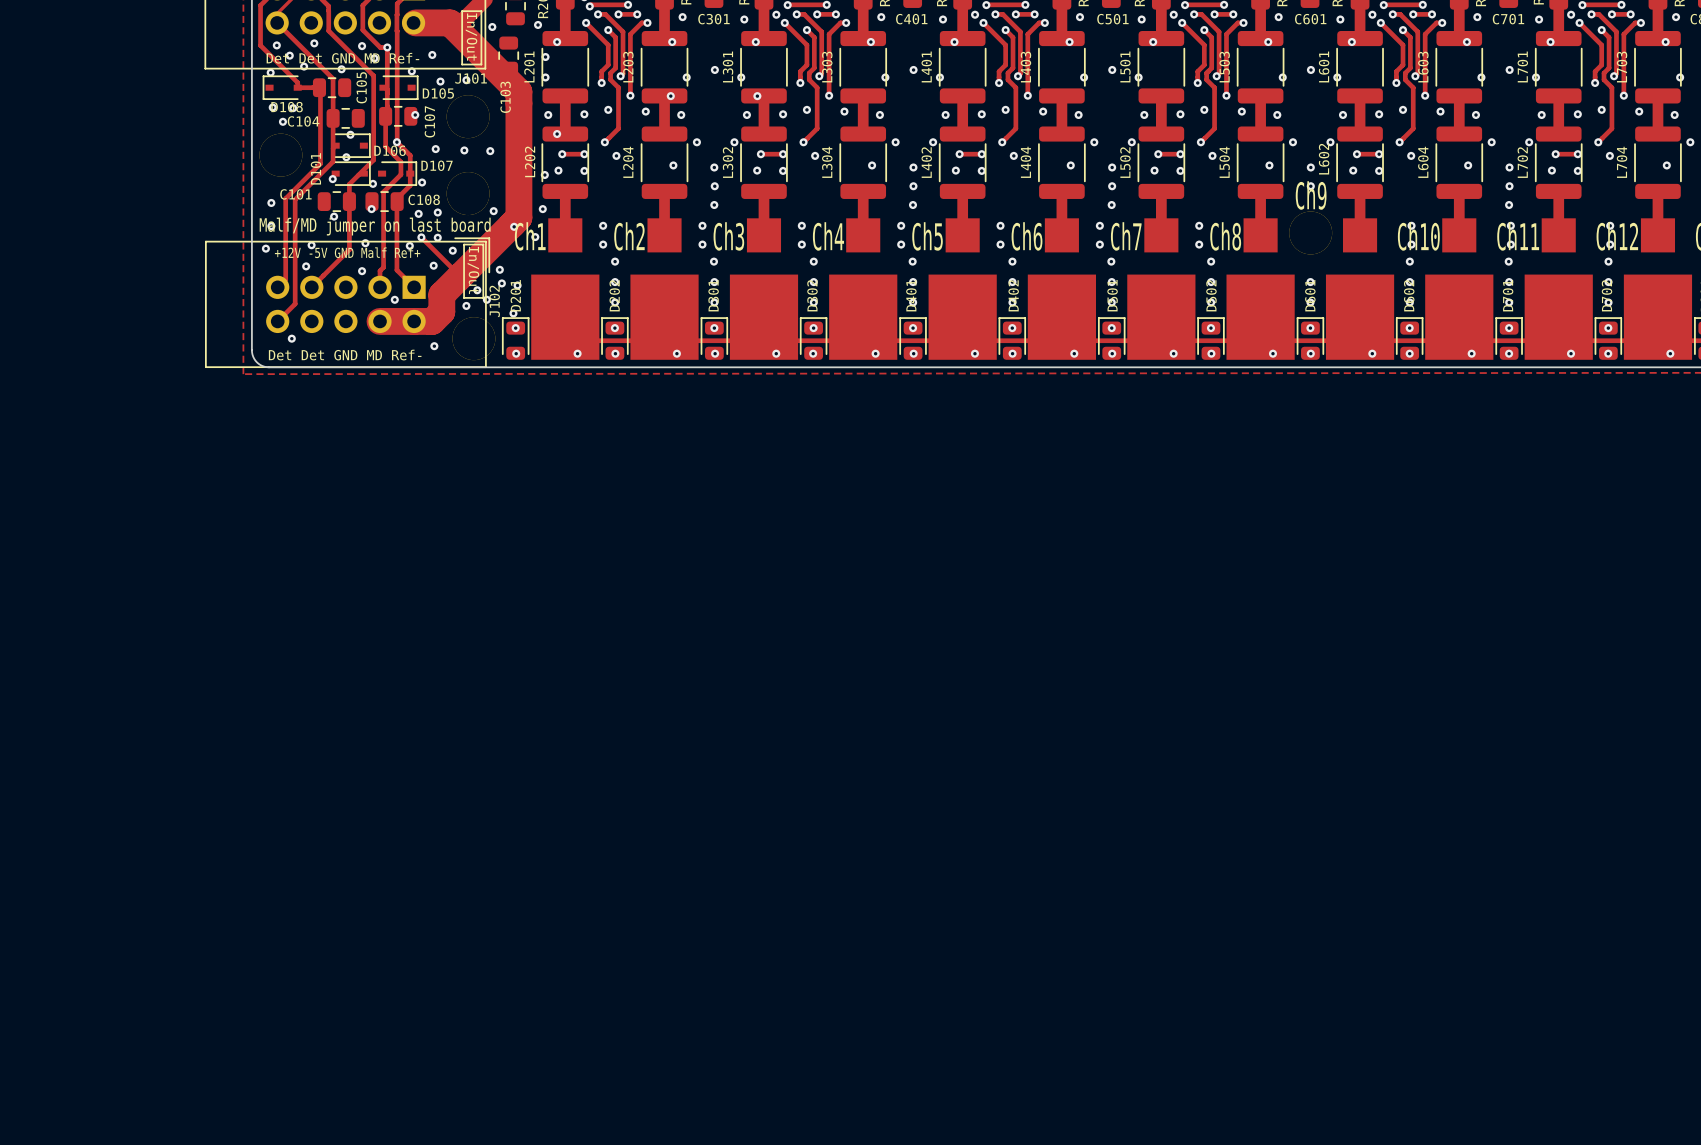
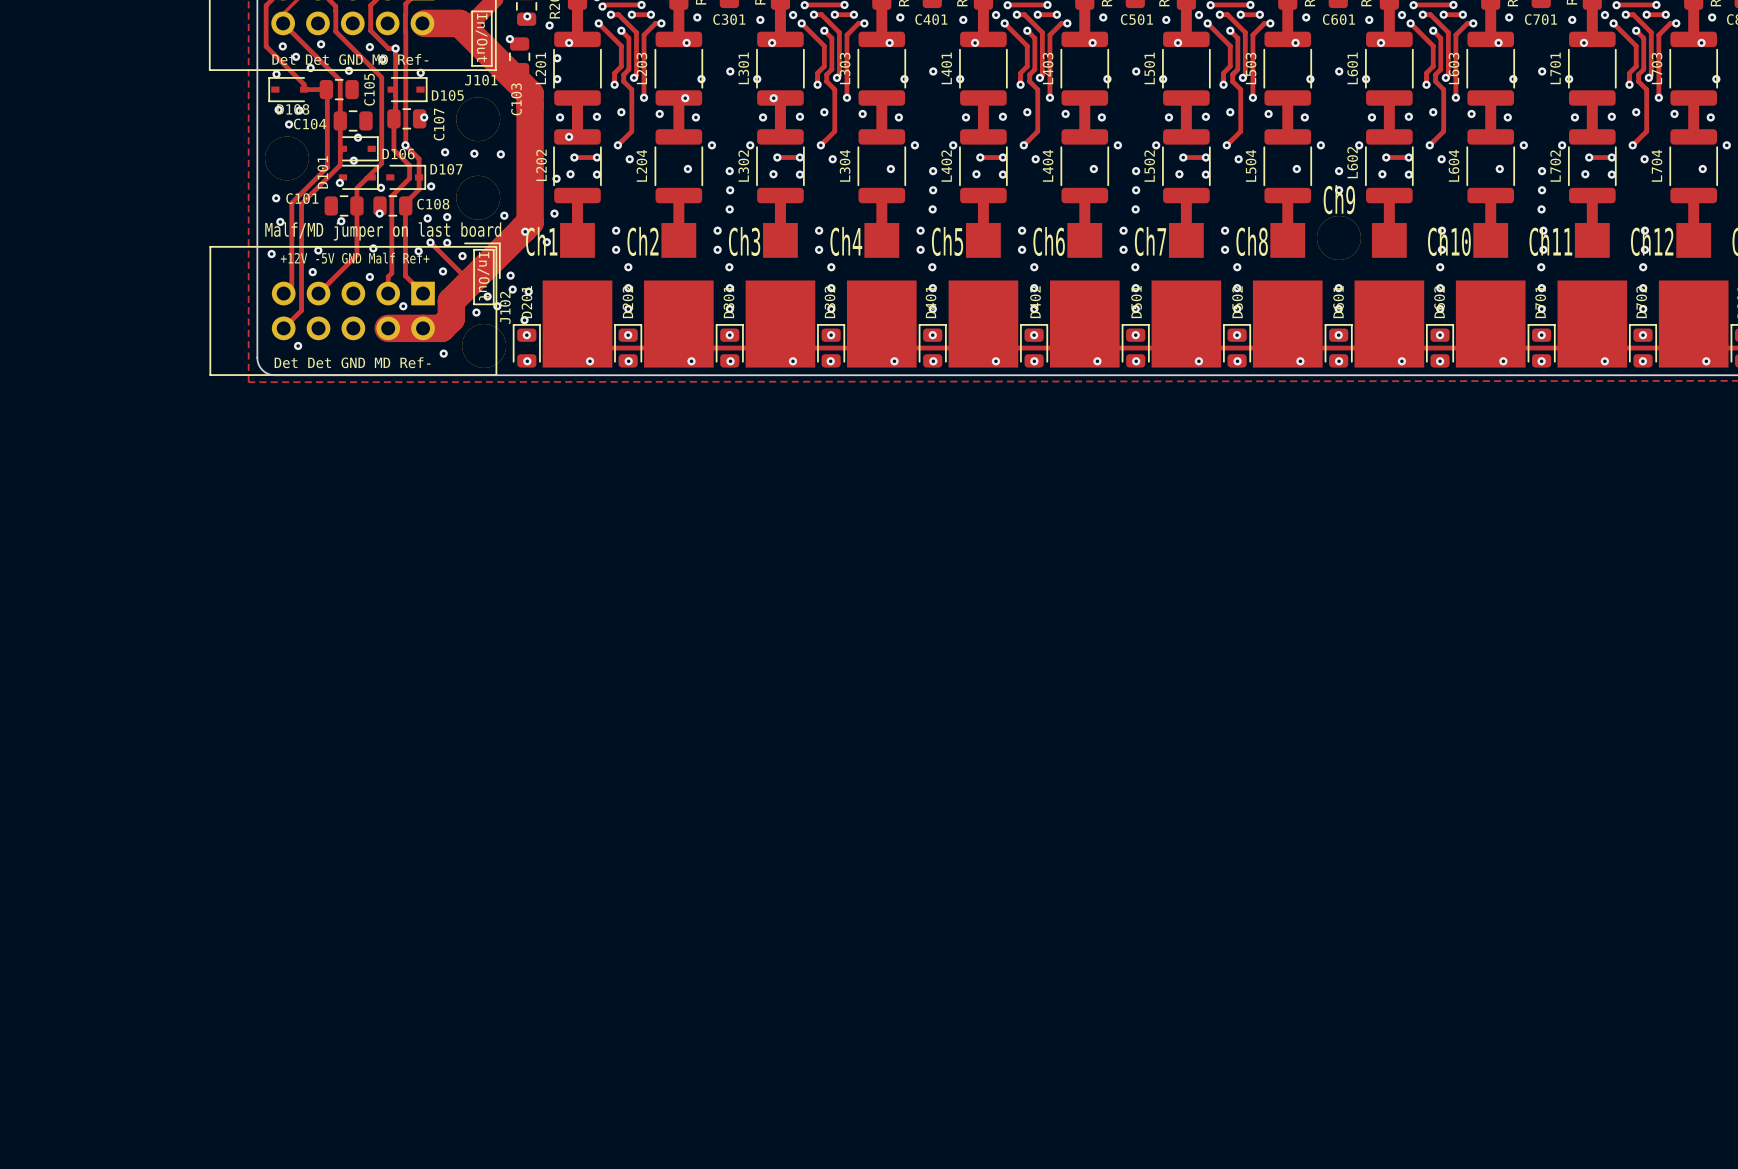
via: none -> (527, 16)
via: (492, 27) -> none
via: none -> (509, 39)
via: (432, 54) -> none
via: (466, 80) -> none
via: (440, 81) -> none
via: none -> (276, 198)
via: (271, 202) -> none
via: none -> (280, 221)
via: (271, 226) -> none

